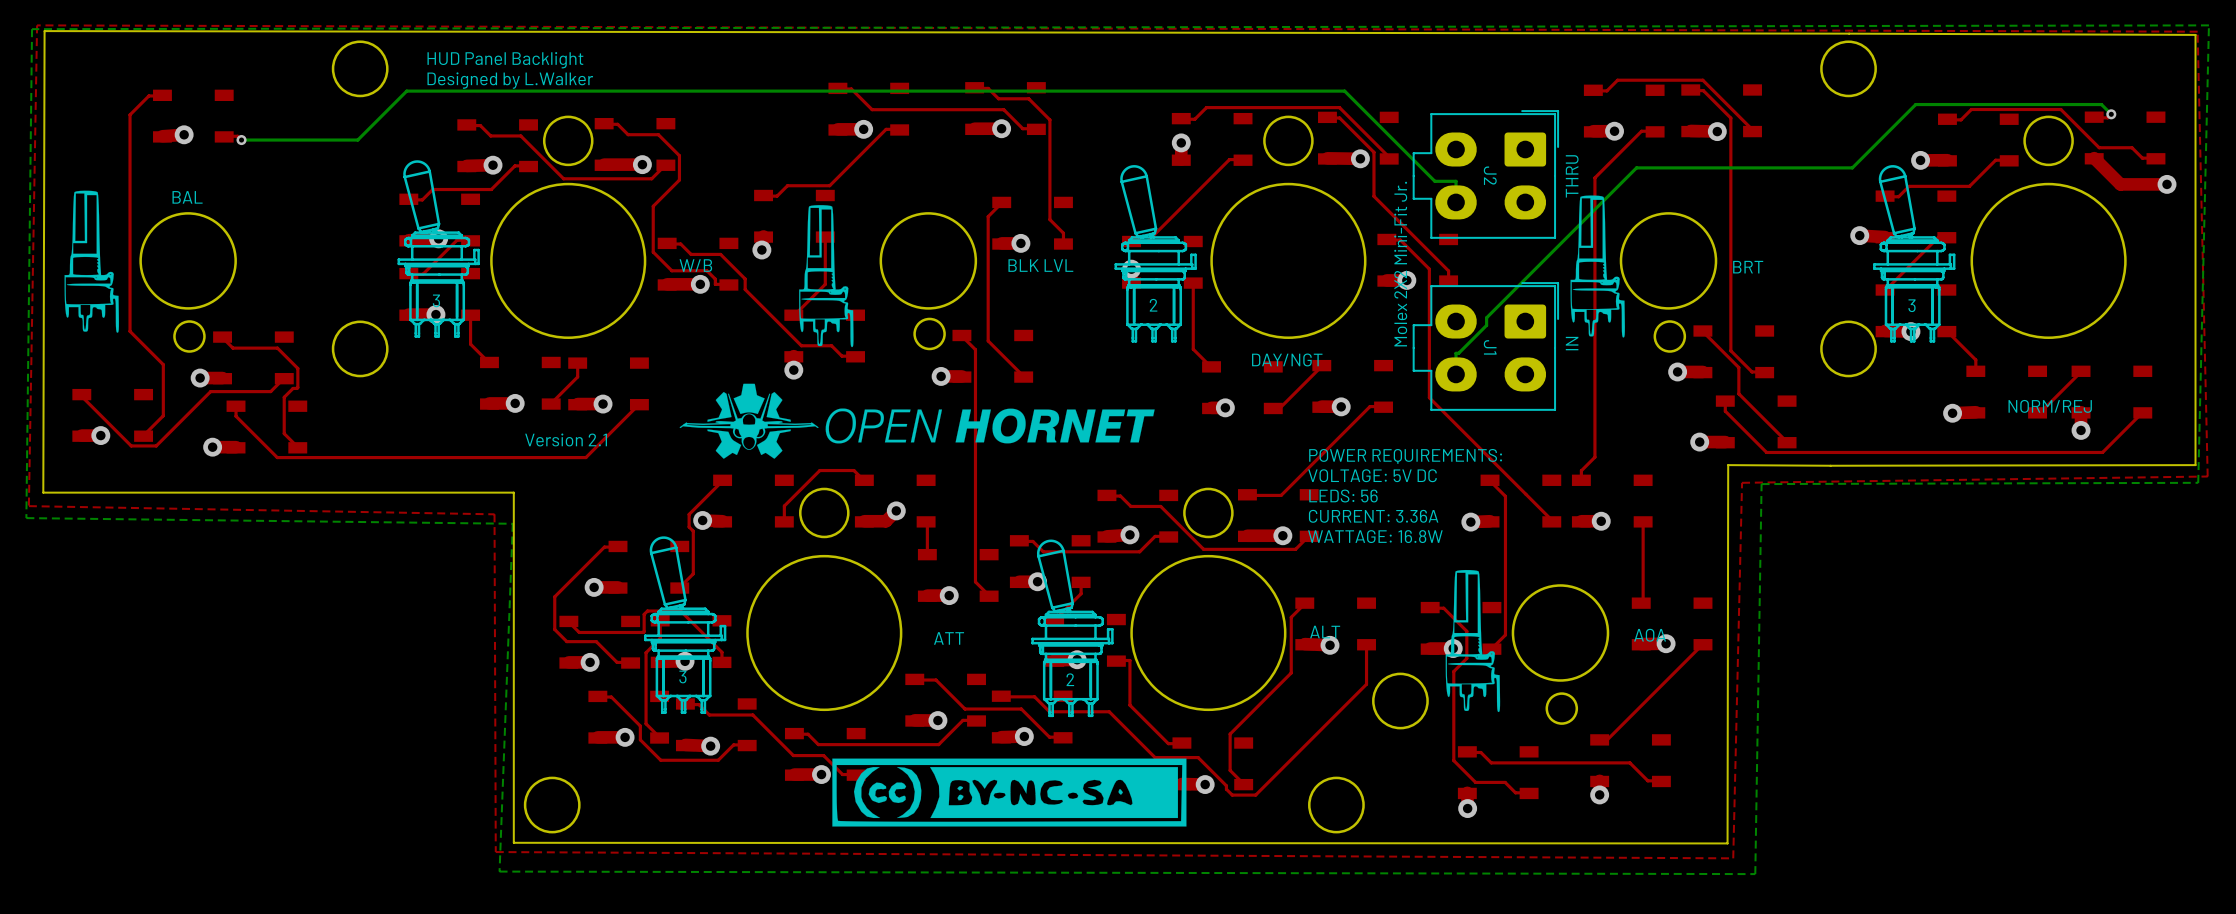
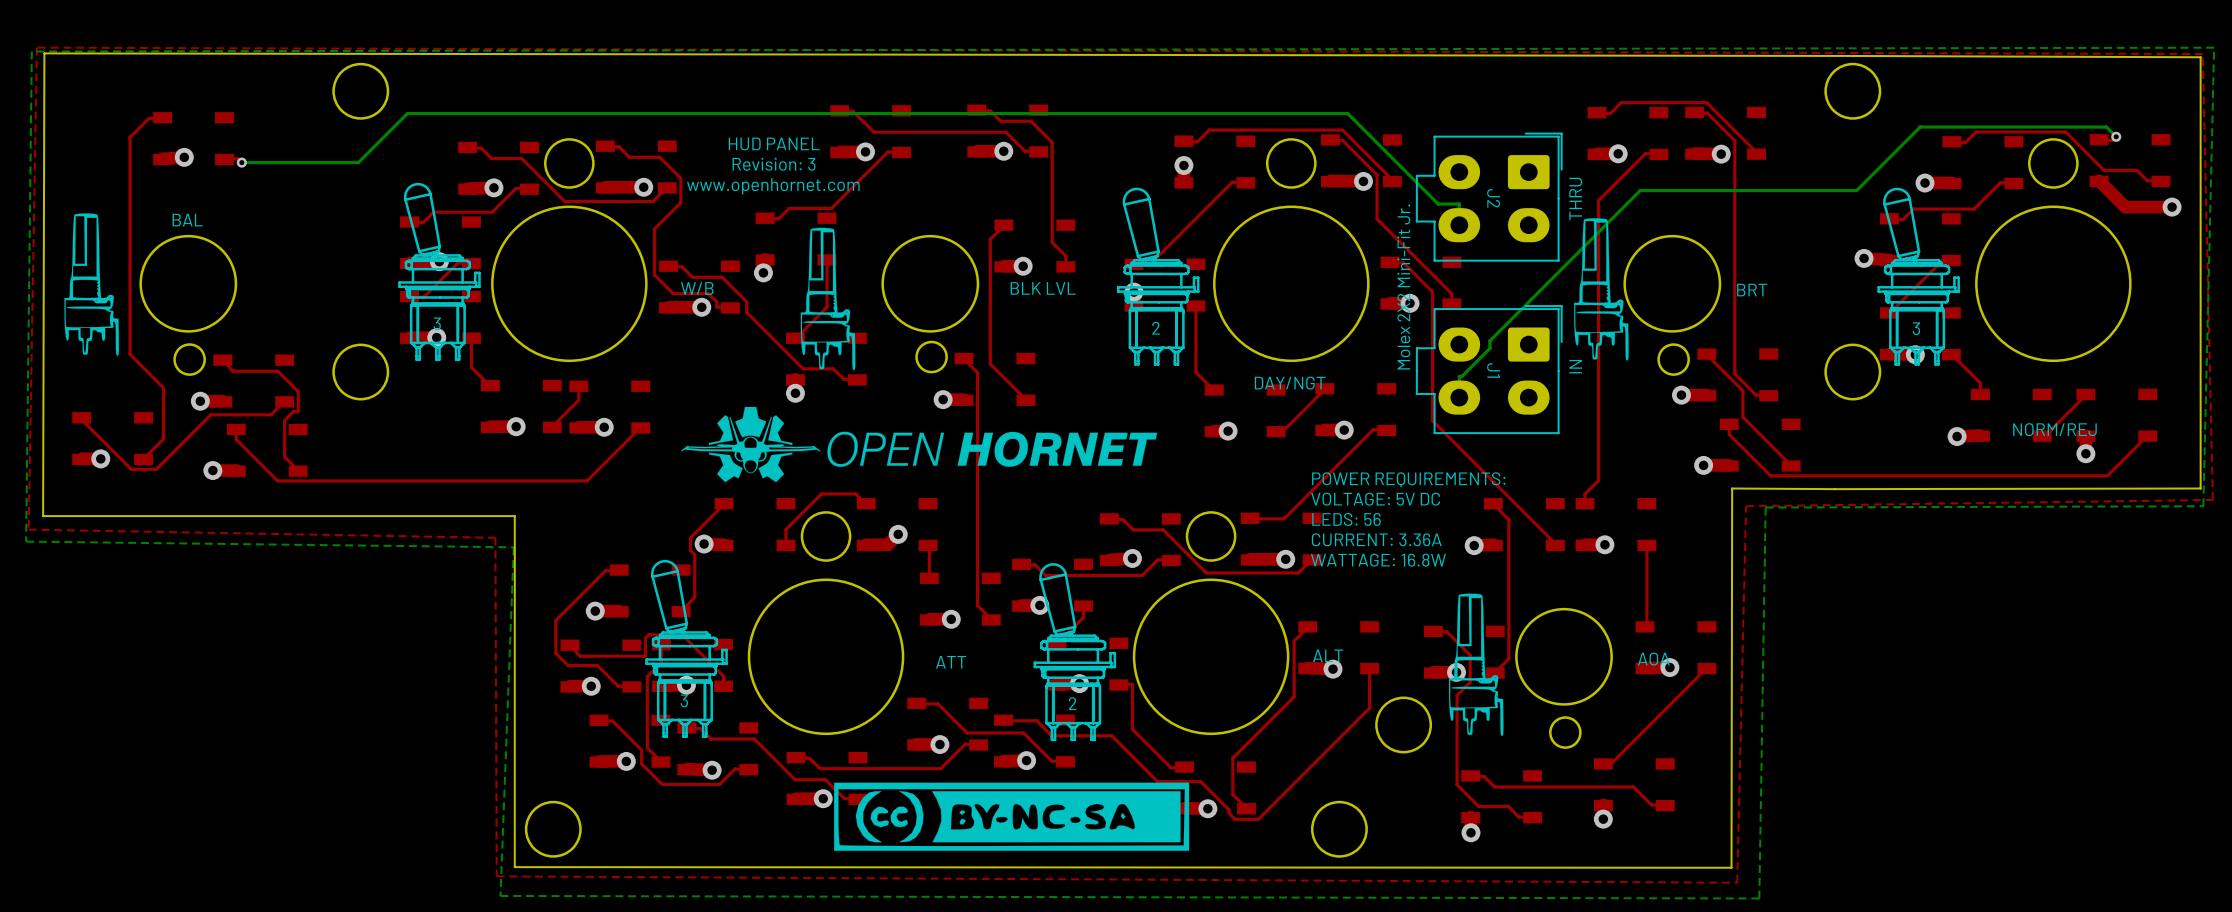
text: HUD Panel Backlight (505, 60) -> none
text: Designed by L.Walker (510, 80) -> none
text: none -> HUD PANEL (774, 144)
text: none -> Revision: 3 (773, 164)
text: none -> www.openhornet.com (773, 186)
text: Version 2.1 (566, 439) -> none

